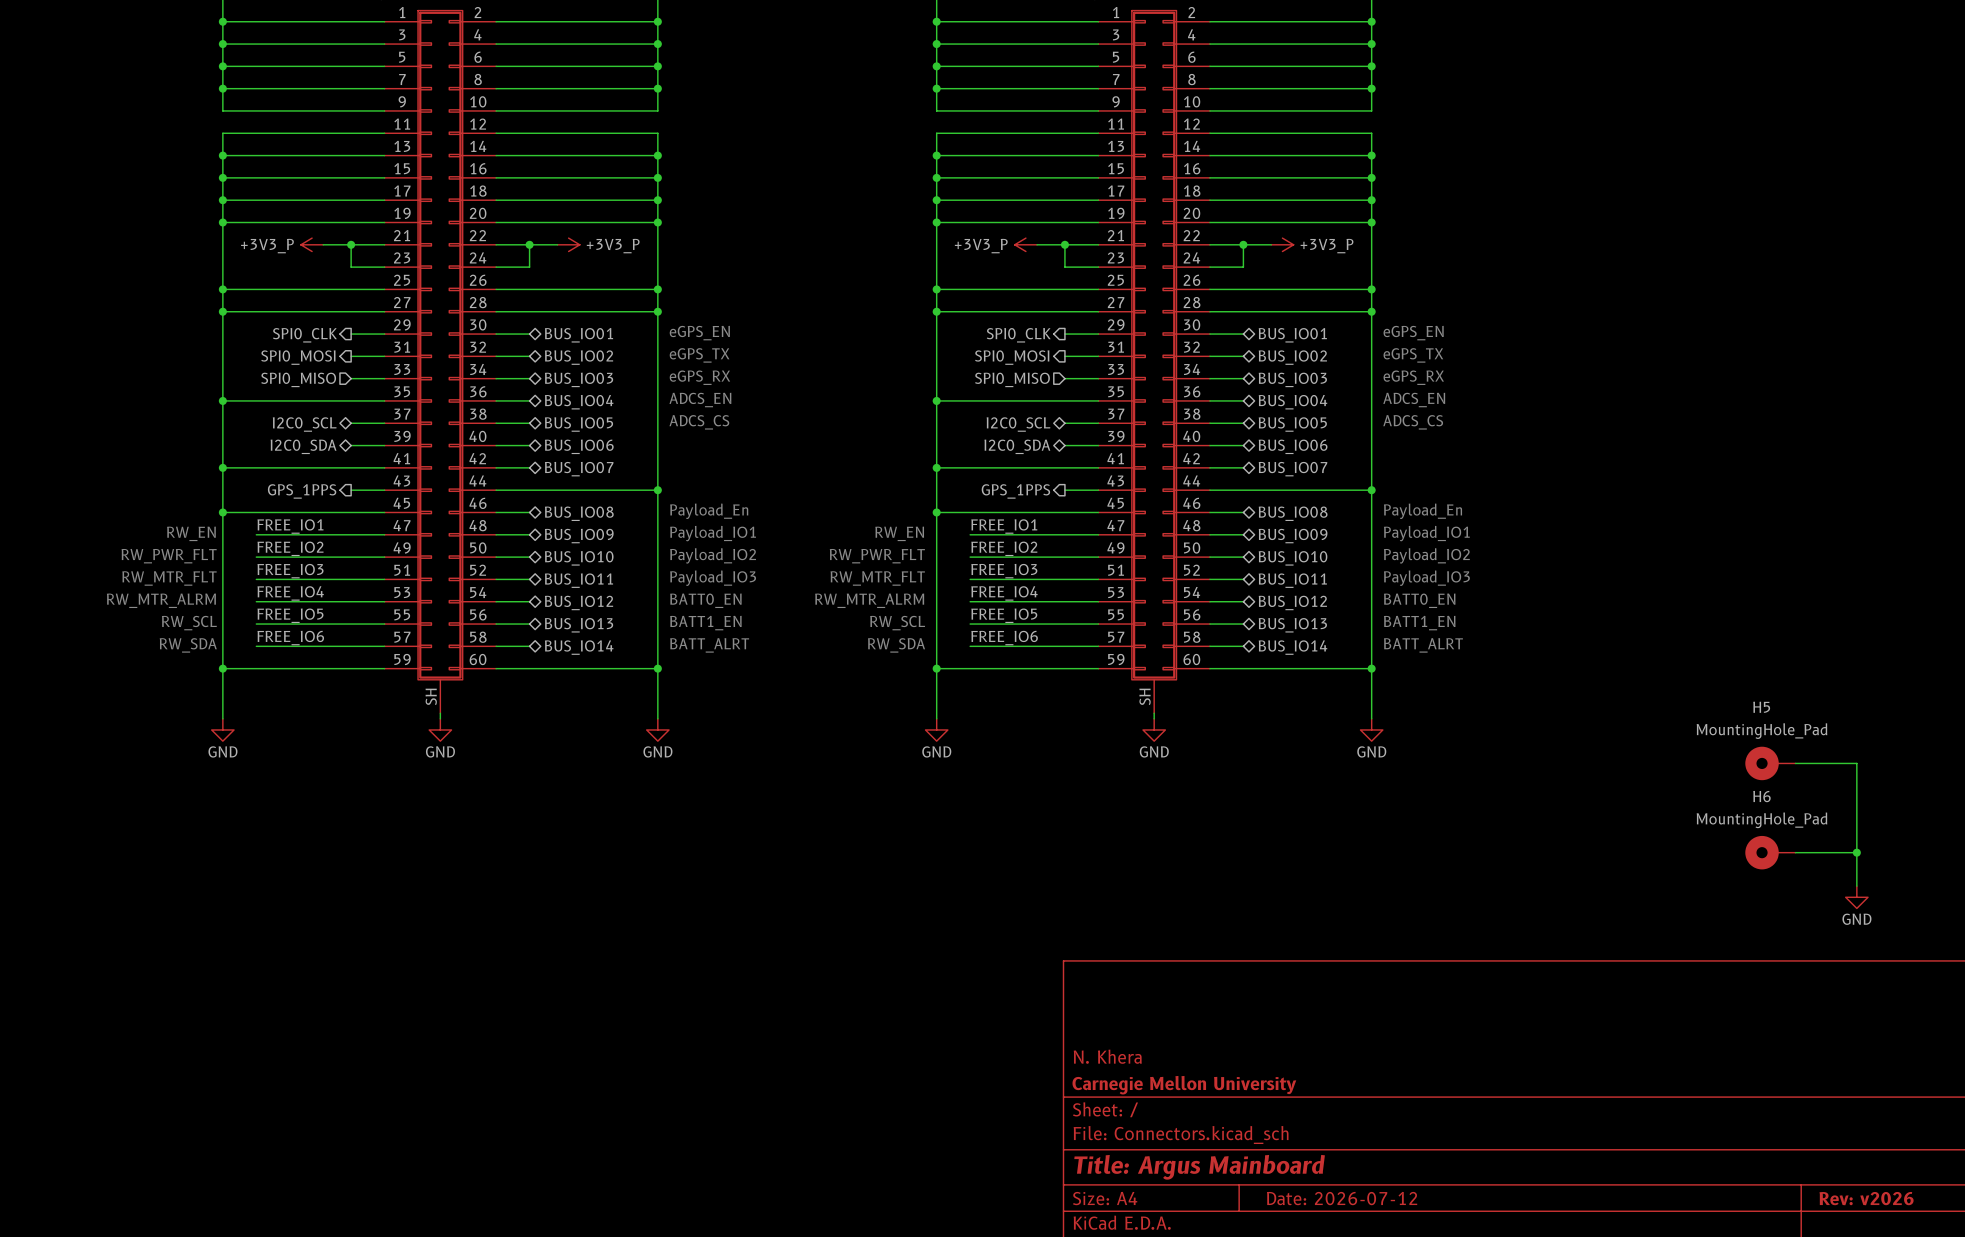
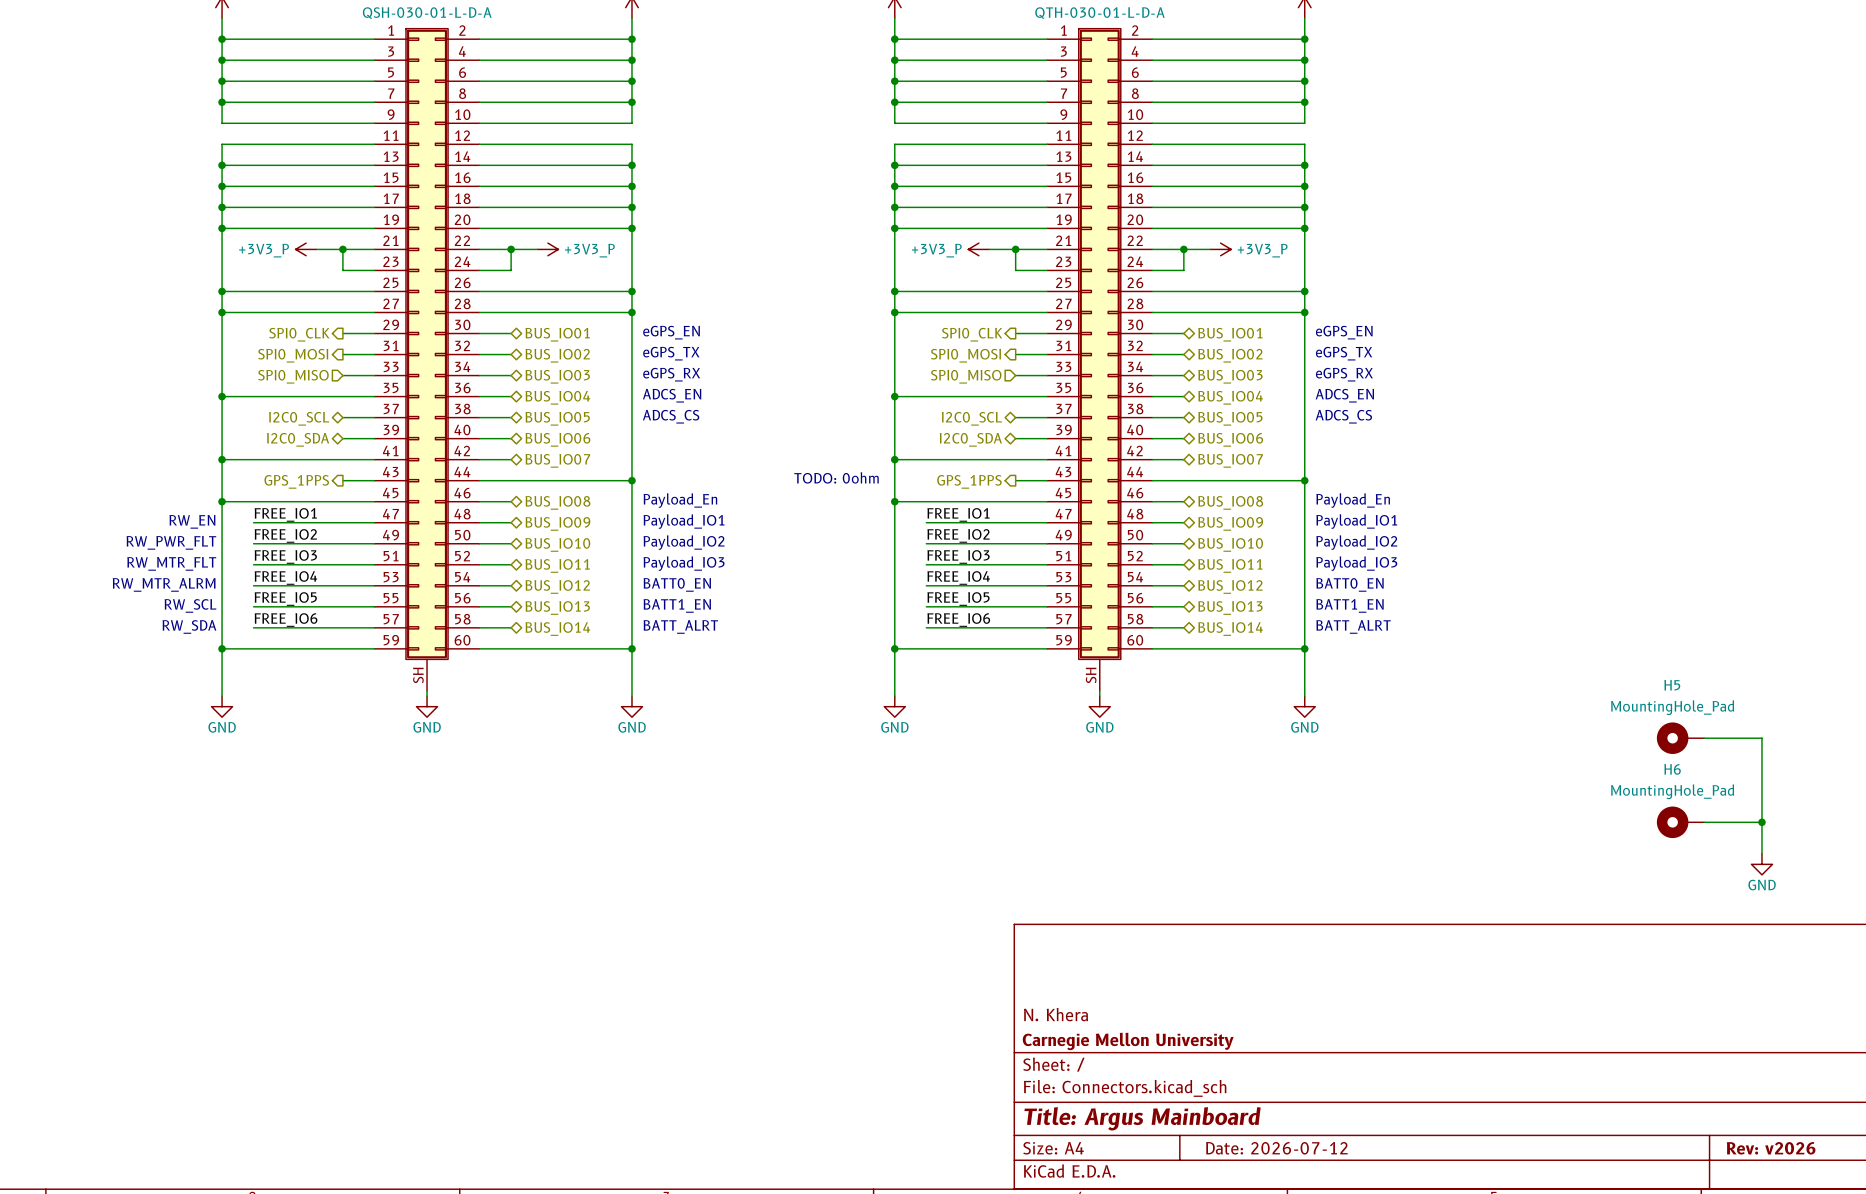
text: none -> TODO: 0ohm (836, 477)
text: RW_EN (899, 533) -> none
text: RW_PWR_FLT (877, 556) -> none
text: RW_MTR_FLT (877, 578) -> none
text: RW_MTR_ALRM (869, 600) -> none
text: RW_SCL (897, 623) -> none
text: RW_SDA (896, 645) -> none

